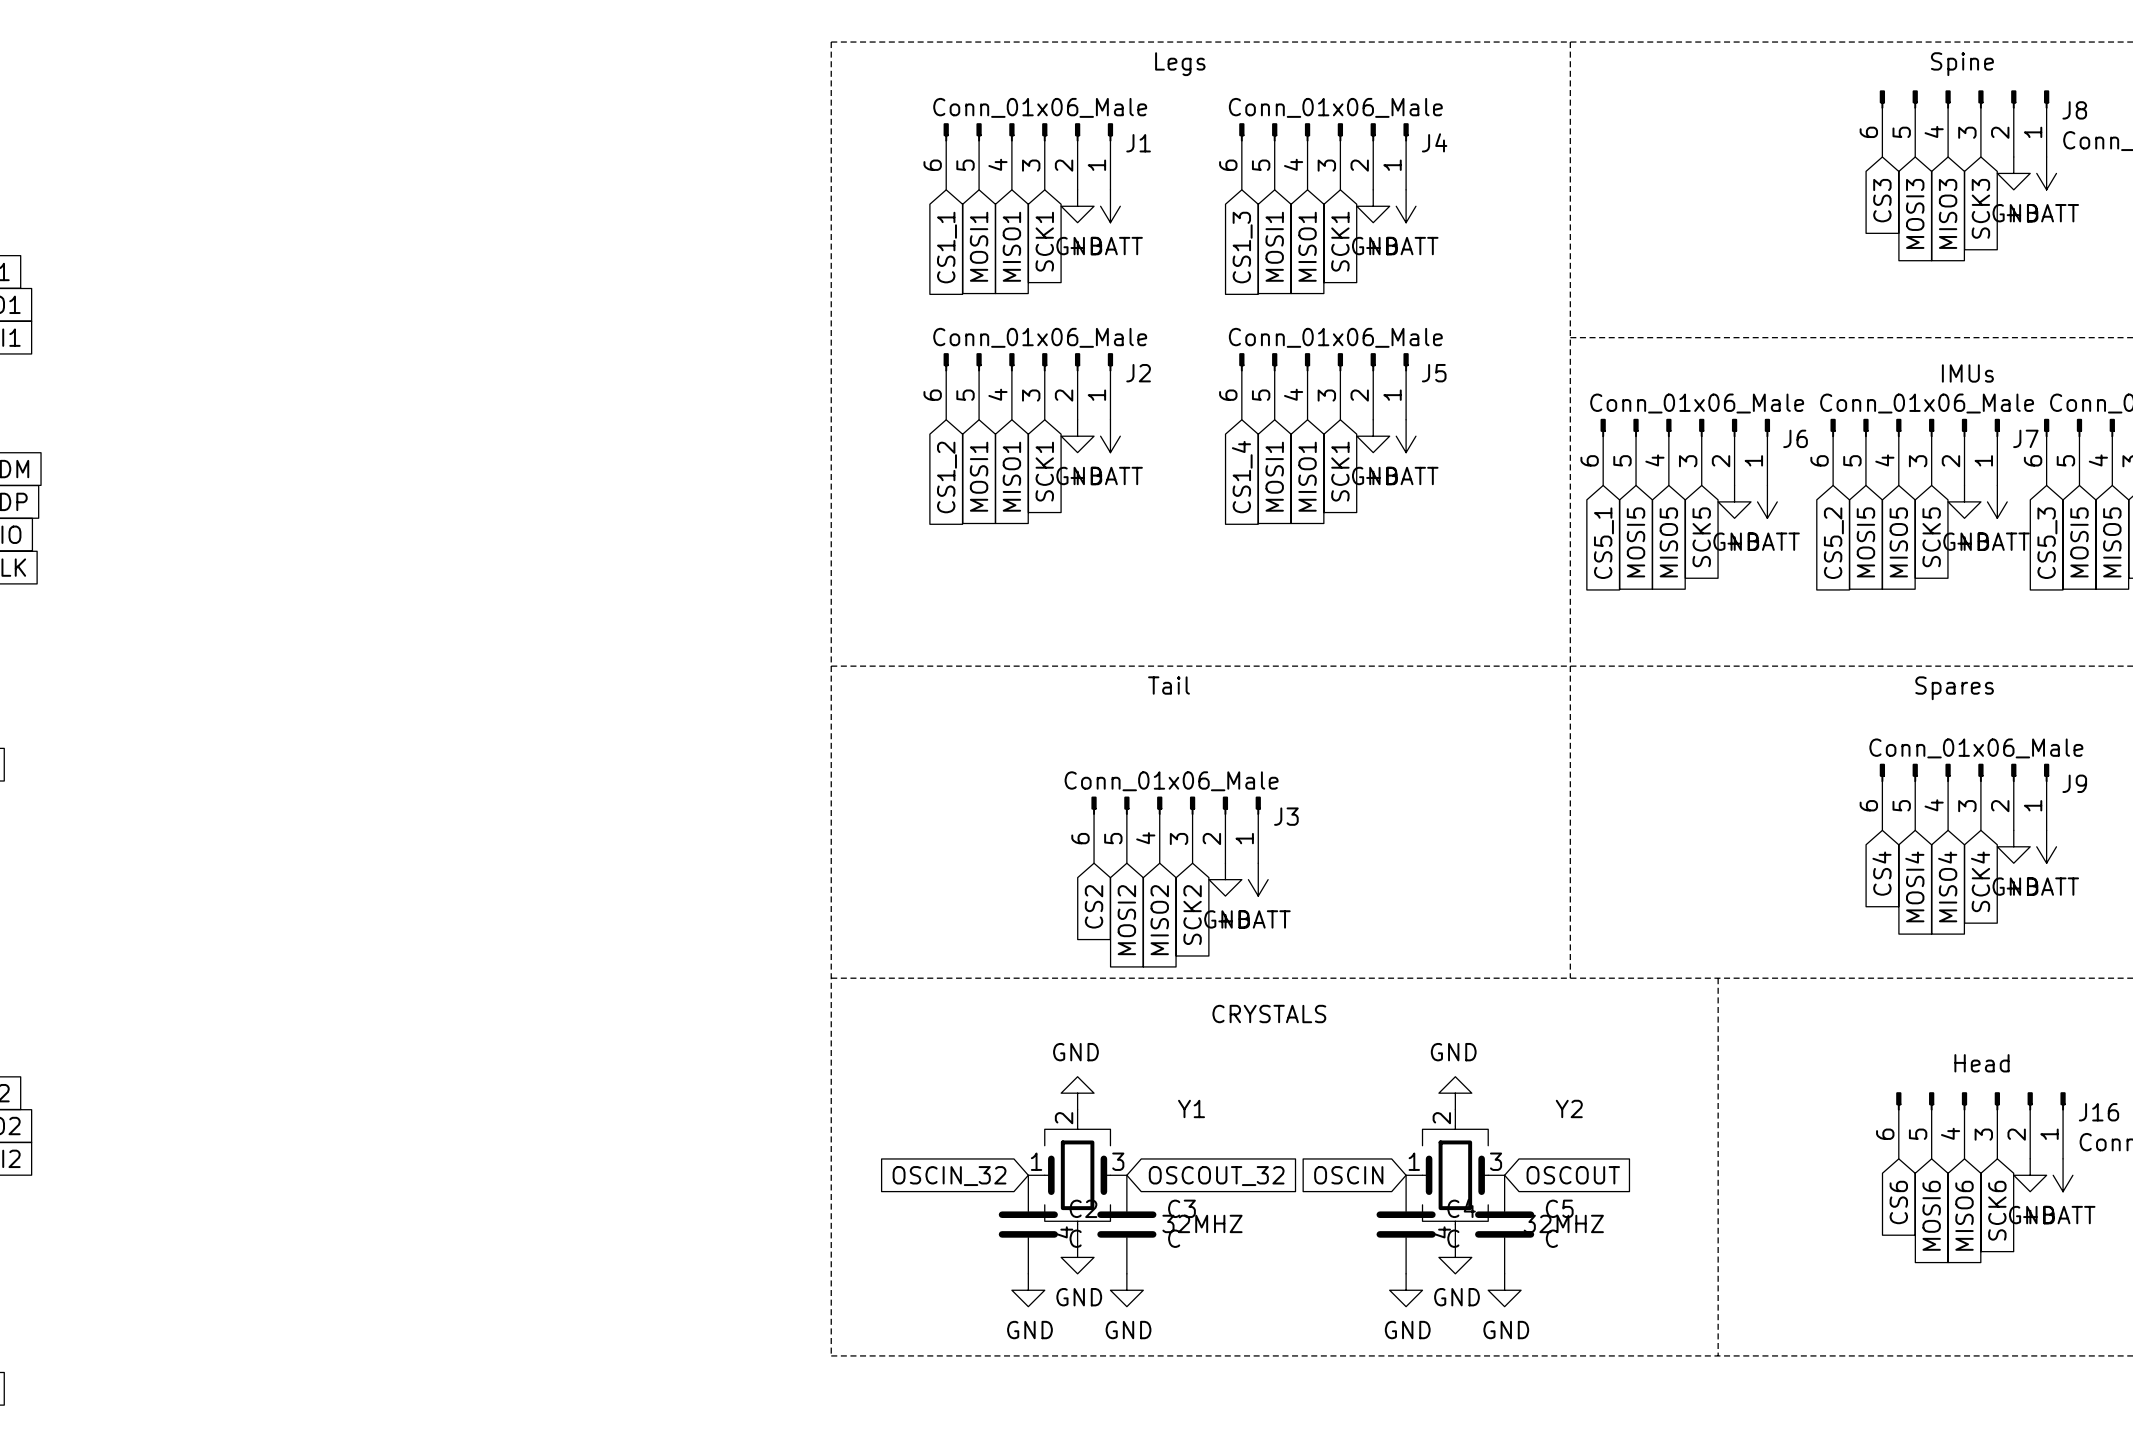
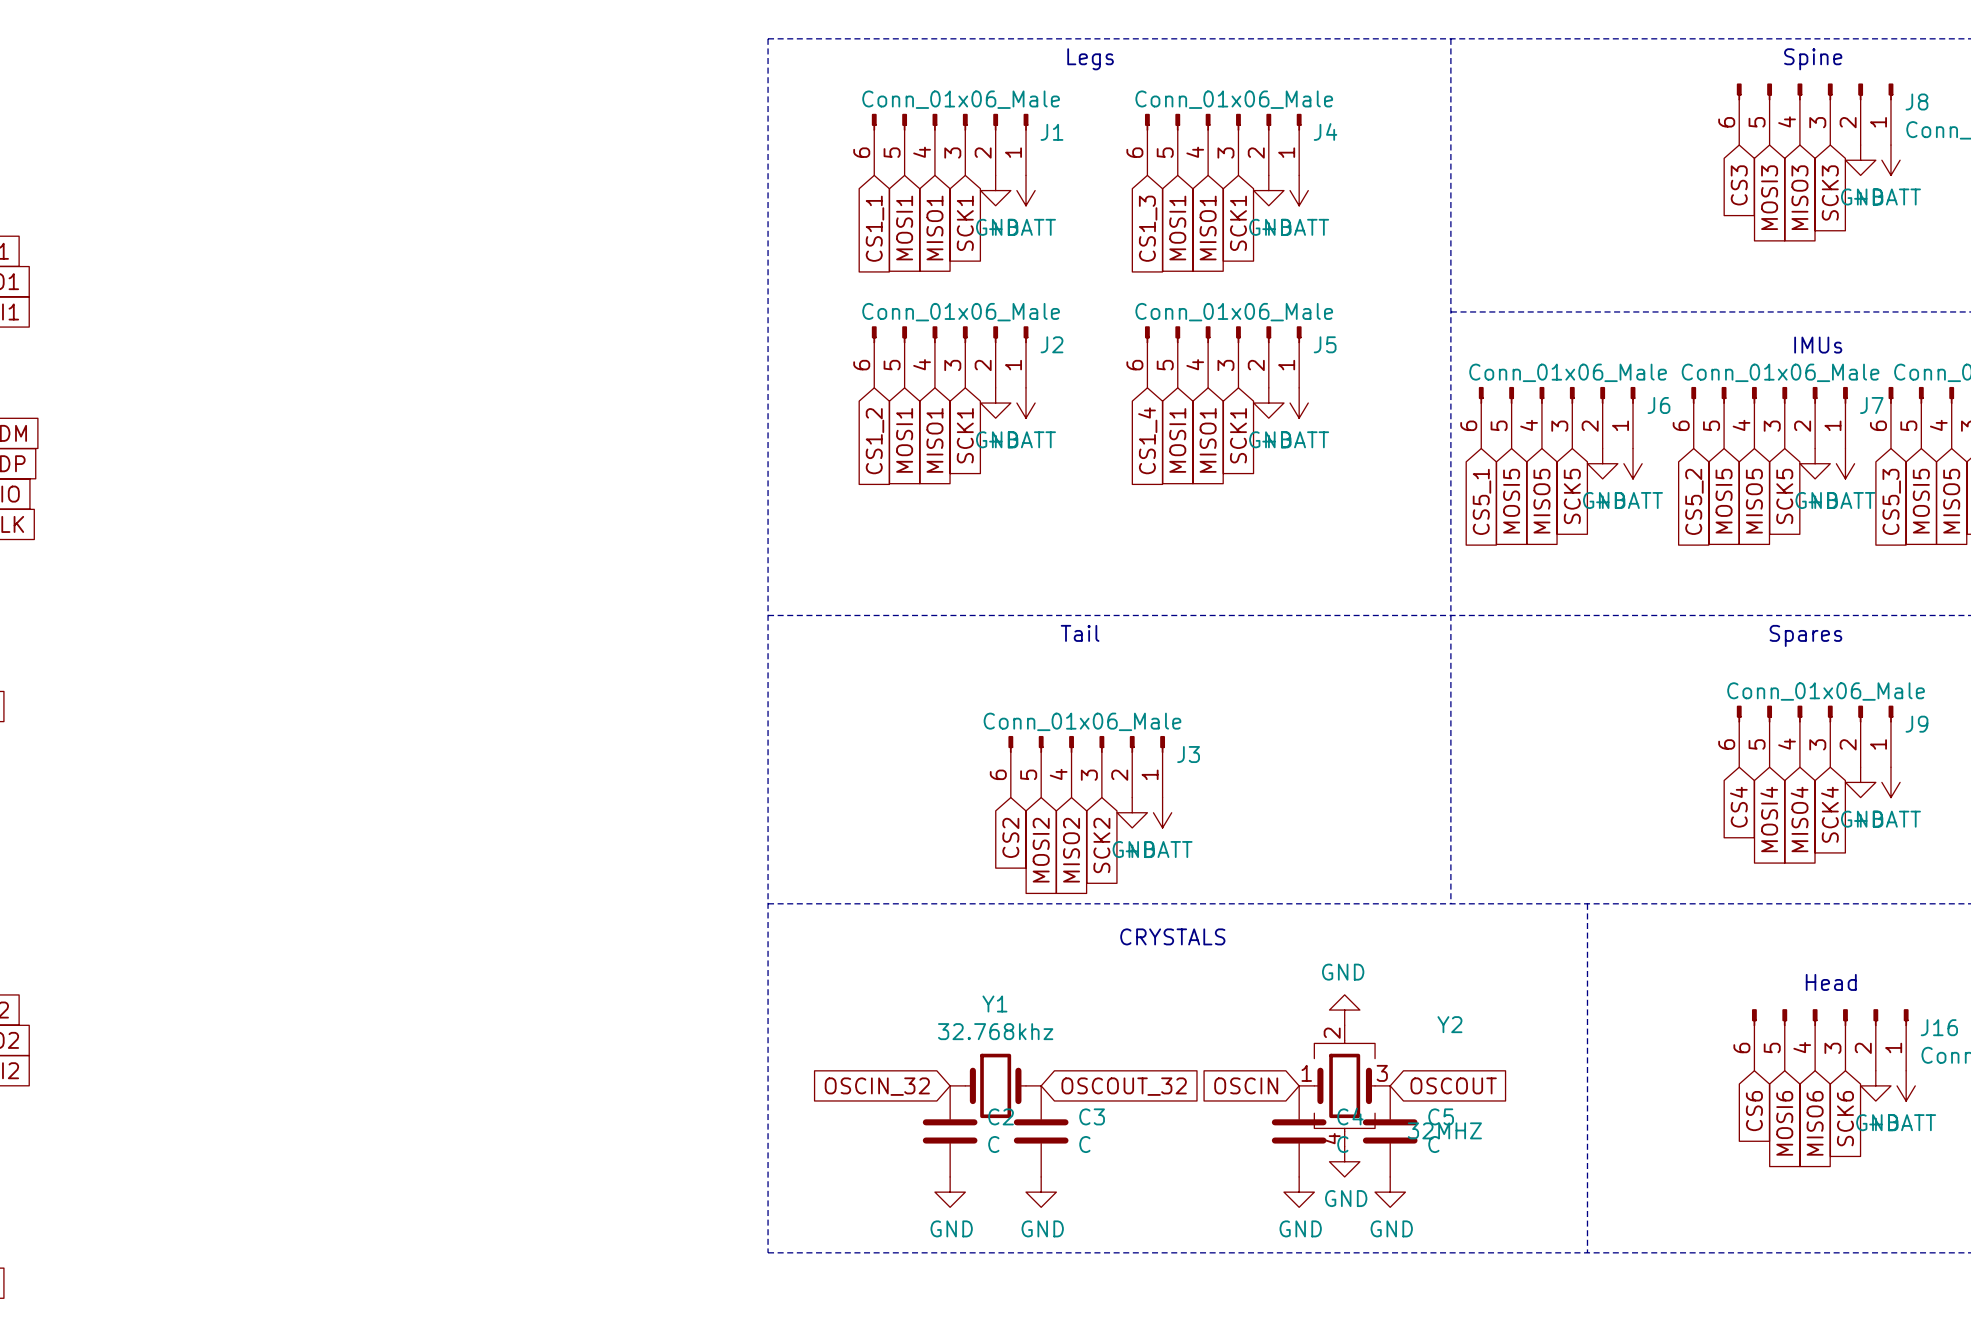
power symbol: GND (1077, 1093) -> none
Y1 name position: Y1 (1191, 1108) -> Y1 (994, 1004)
Y1 symbol: [1028, 1109, 1127, 1241] -> [950, 1053, 1042, 1119]
Y1 value: 32MHZ (1202, 1223) -> 32.768khz (995, 1031)
power symbol: GND (1077, 1257) -> none

